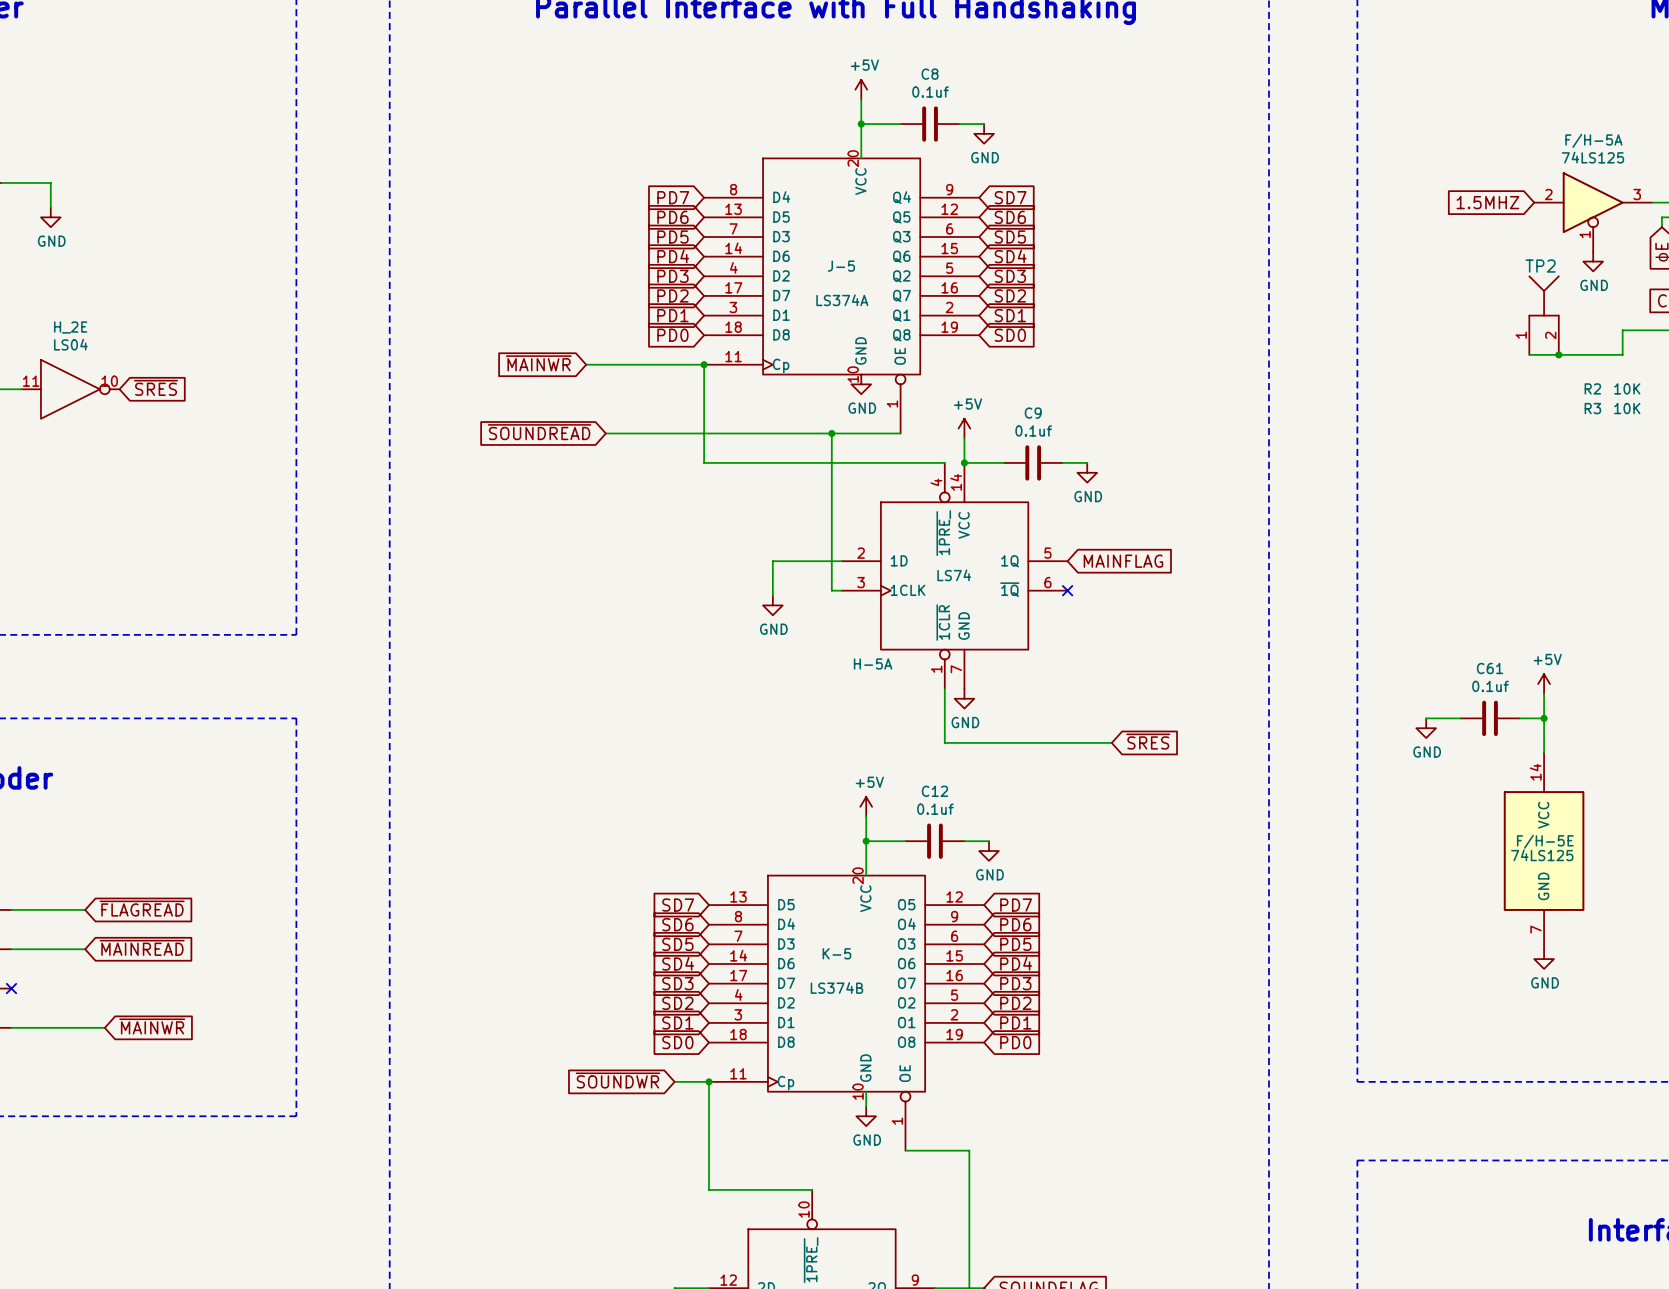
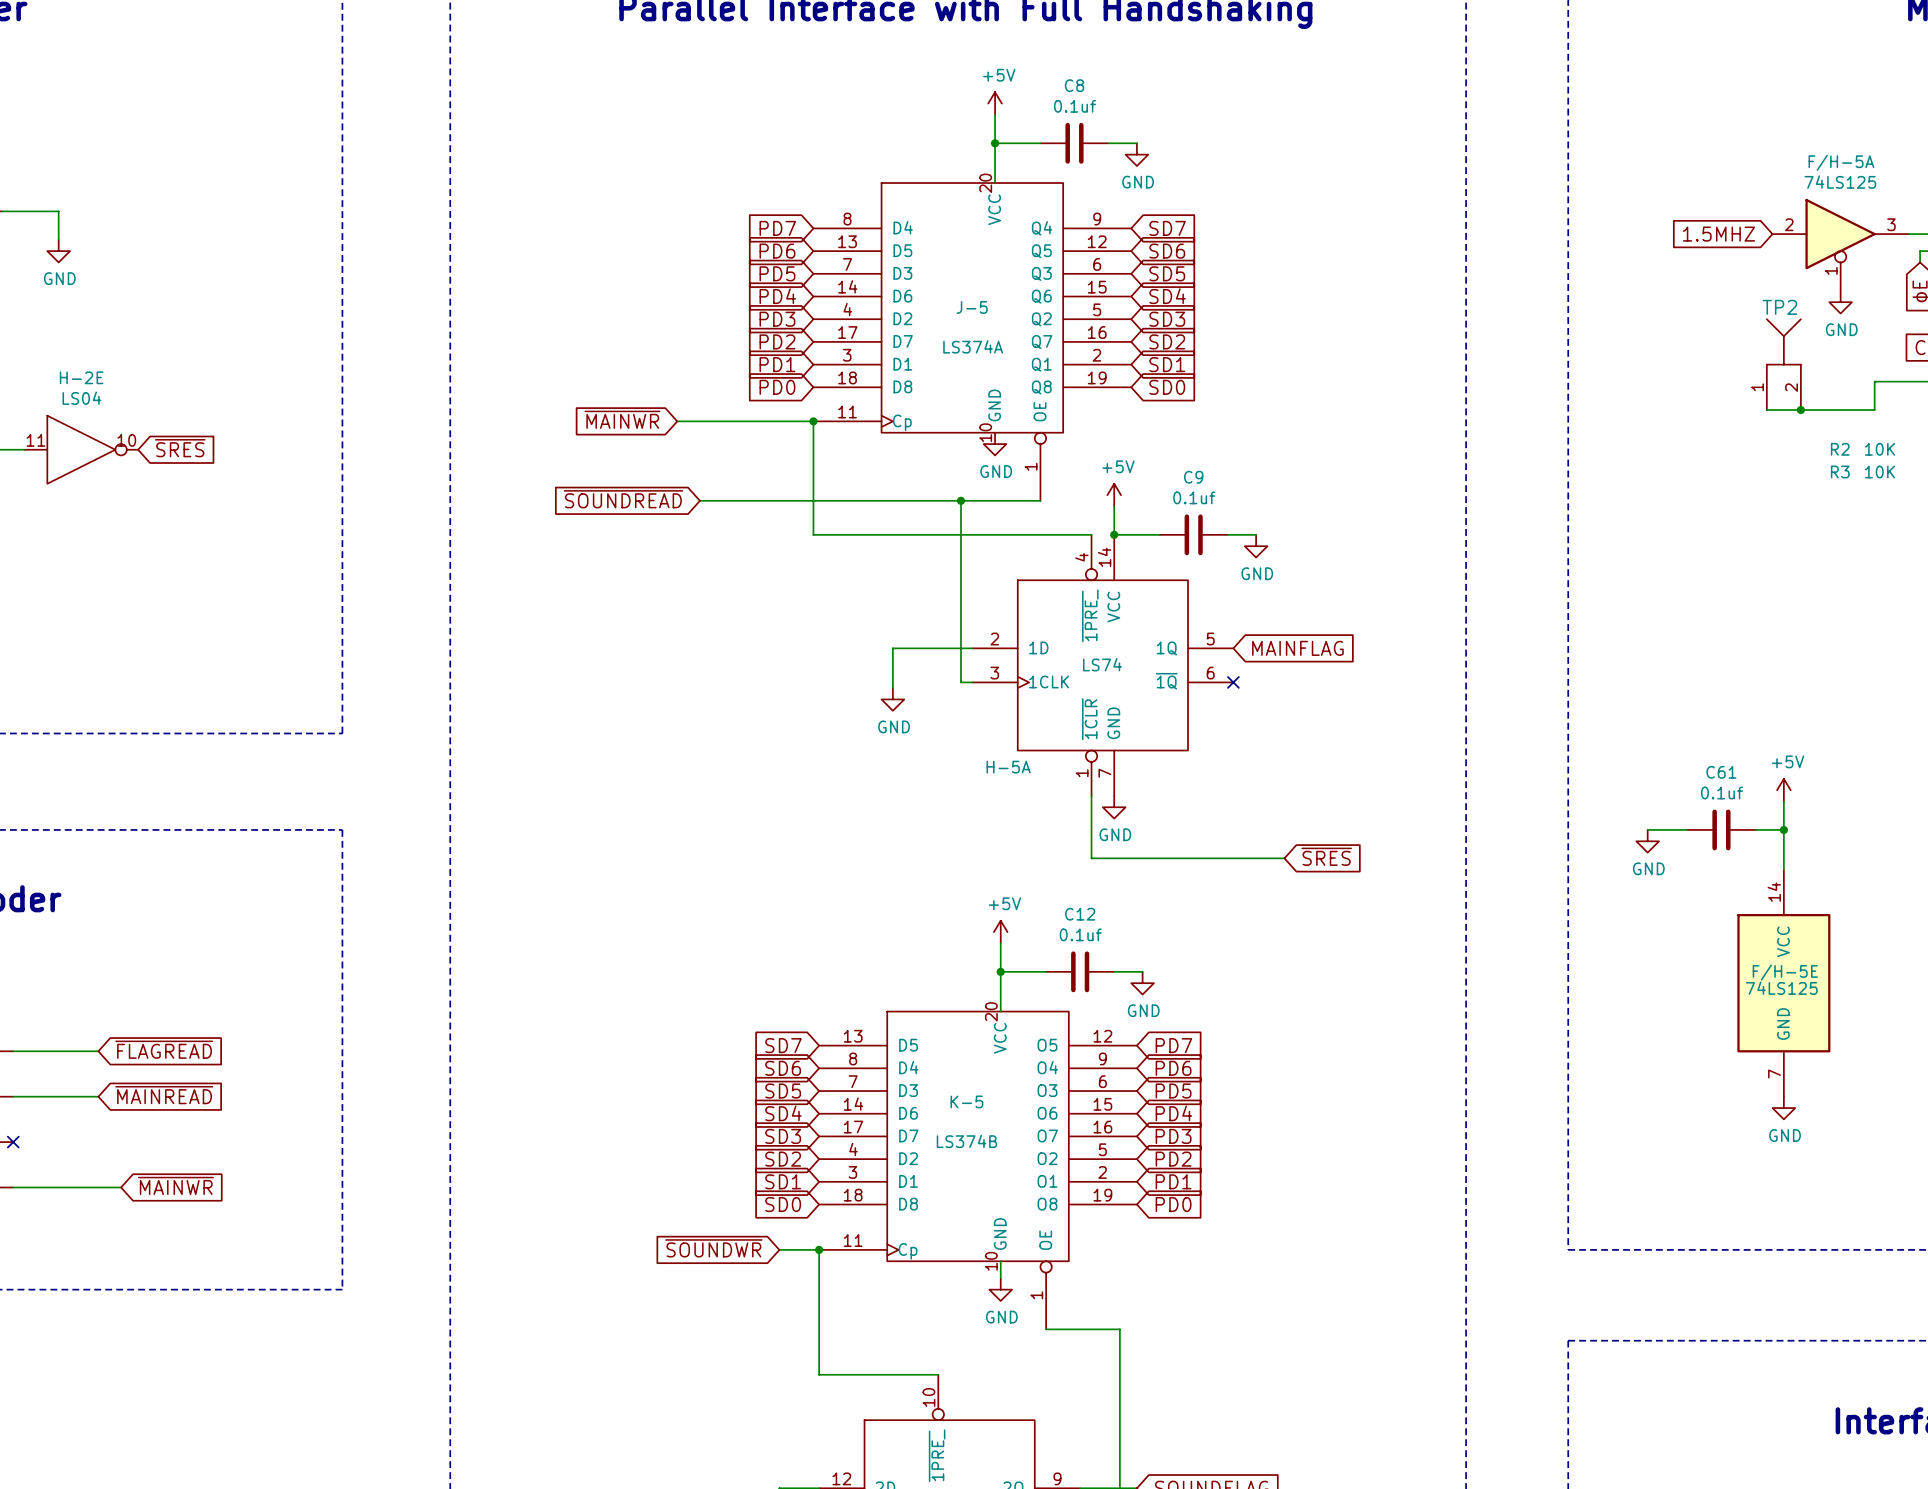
H_2E name: H_2E (70, 327) -> H-2E (81, 377)

